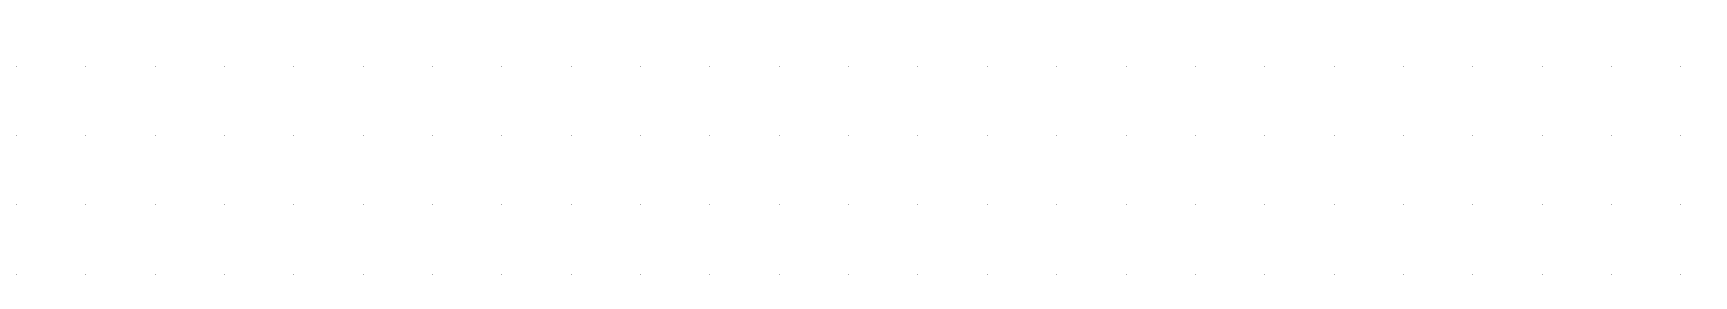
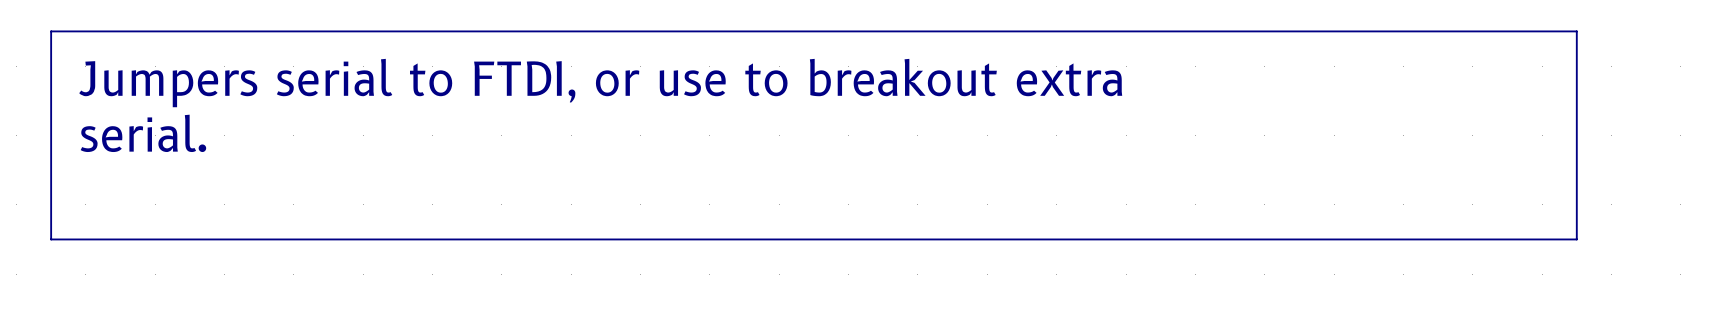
line: none -> (51, 31) (1576, 31) (1576, 239) (51, 239) (51, 31)
text: none -> Jumpers serial to FTDI, or use to breakout extra (600, 83)
text: none -> serial. (143, 133)

